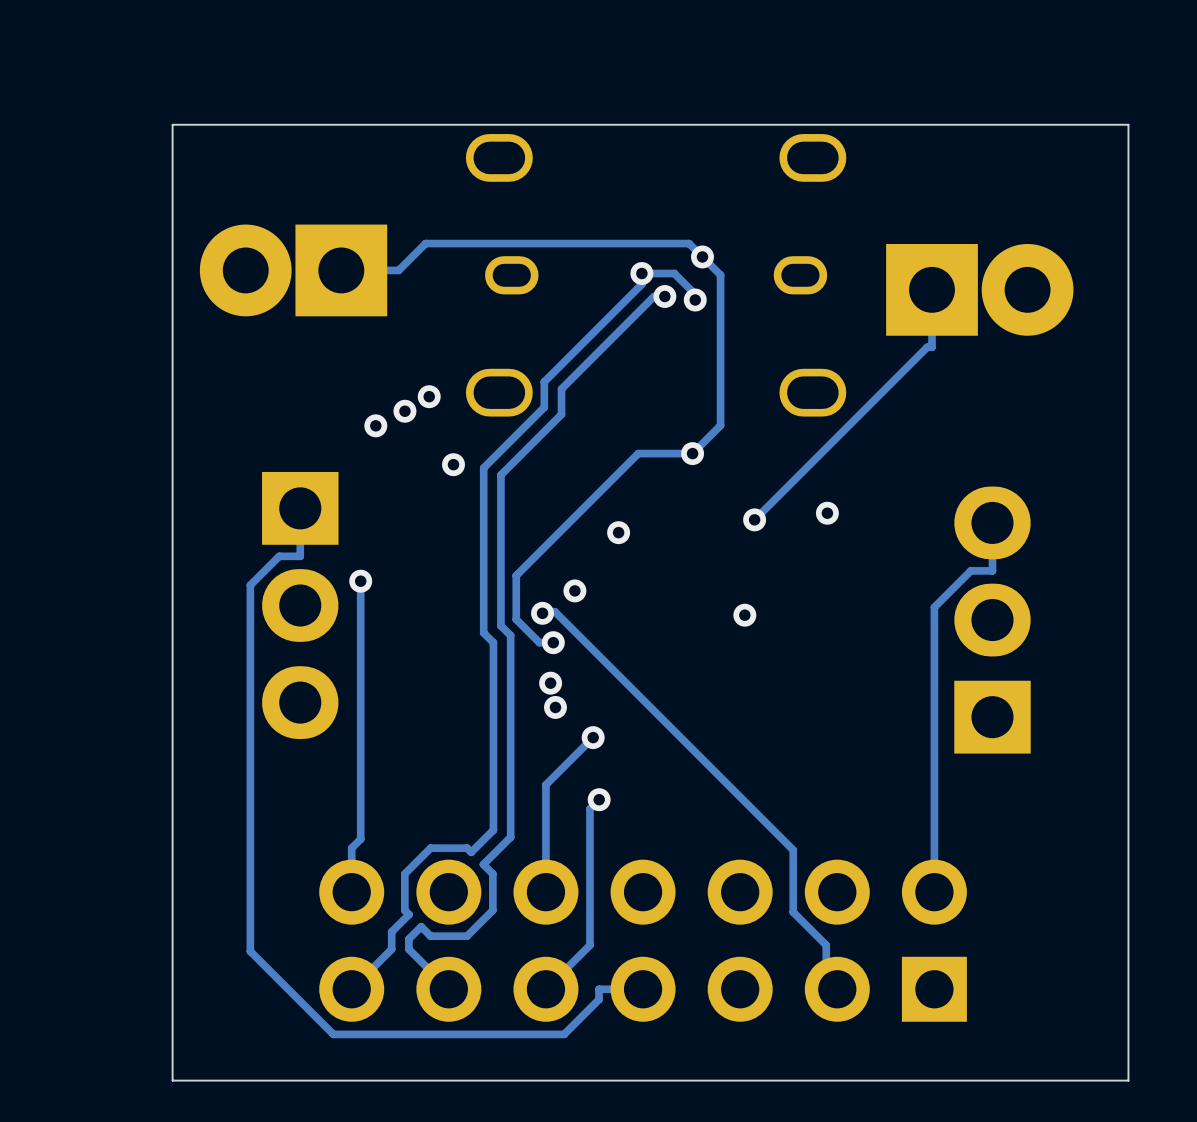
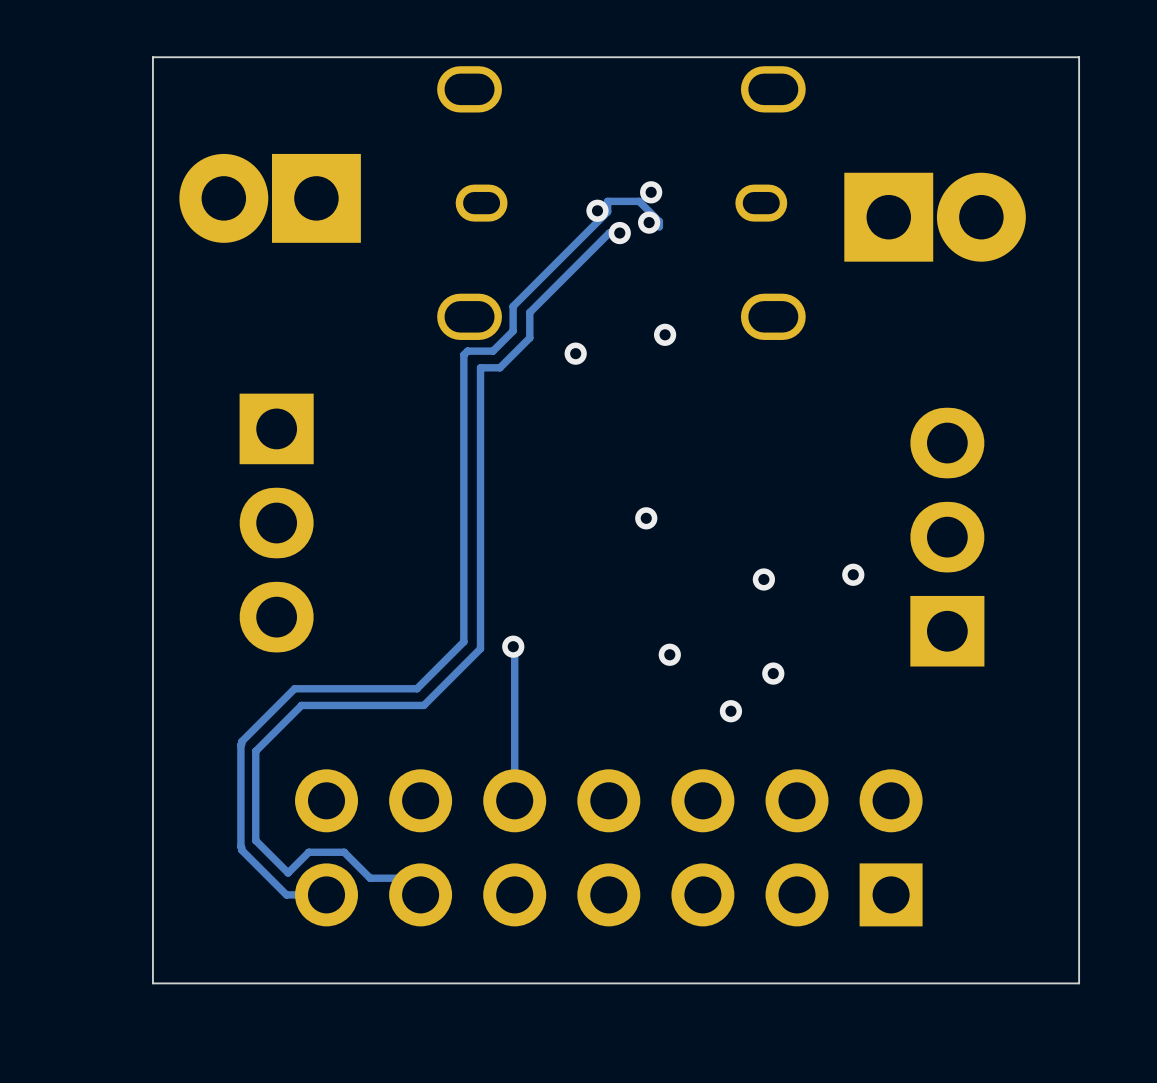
via position: (702, 256) -> (651, 192)
track: (341, 270) (398, 270) (425, 243) (689, 243) (720, 275) (720, 425) (692, 453) (638, 453) (516, 575) (516, 619) (539, 642) (553, 642) -> none
via position: (641, 273) -> (597, 210)
track: (932, 289) (932, 347) (927, 347) (754, 519) -> none
via: none -> (649, 222)
track: (664, 296) (654, 296) (561, 389) -> (619, 233) (609, 233) (529, 313)
via: (664, 296) -> none
via: (695, 300) -> none
via: none -> (619, 233)
via: (429, 396) -> none
track: (544, 407) (483, 467) (483, 632) (493, 642) -> (513, 331) (493, 351) (467, 351) (463, 354) (463, 559)
via: (404, 411) -> none
via: none -> (665, 334)
track: (561, 414) (500, 475) (500, 625) (510, 635) -> (529, 337) (499, 367) (480, 367) (480, 552)
via: (375, 425) -> none
via: none -> (575, 353)
via: (692, 453) -> none
via: (453, 464) -> none
track: (300, 508) (300, 556) (279, 556) (250, 585) (250, 951) (333, 1034) (564, 1034) (599, 999) (599, 989) (643, 989) -> none
via: (827, 513) -> none
via: (754, 519) -> none
track: (992, 522) (992, 570) (970, 570) (934, 607) (934, 892) -> none
via: (618, 532) -> none
track: (360, 581) (360, 839) (351, 848) (351, 892) -> none
via: (360, 581) -> none
via: (574, 590) -> none
via: none -> (646, 518)
track: (542, 613) (554, 611) (793, 850) (793, 912) (826, 945) (826, 978) (837, 989) -> none
via: (542, 613) -> none
via: (744, 615) -> none
via: (553, 642) -> none
via: none -> (853, 574)
via: none -> (763, 579)
via: (550, 683) -> none
via: (555, 707) -> none
track: (493, 728) (493, 830) (471, 852) (467, 848) (430, 848) (404, 873) (404, 910) (409, 914) (391, 931) (391, 949) (351, 989) -> (463, 641) (416, 688) (294, 688) (241, 741) (241, 850) (286, 894) (326, 894)
via: none -> (513, 646)
track: (510, 735) (510, 837) (483, 864) (492, 873) (492, 910) (467, 936) (430, 936) (421, 926) (408, 939) (408, 949) (431, 972) -> (480, 648) (423, 705) (301, 705) (255, 751) (255, 840) (288, 872) (308, 852) (344, 852) (370, 878) (403, 878)
track: (593, 737) (545, 784) -> (514, 648) (514, 696)
via: (593, 737) -> none
via: none -> (669, 654)
via: none -> (773, 673)
track: (599, 799) (589, 808) (589, 945) (545, 989) -> none
via: (599, 799) -> none
via: none -> (730, 711)

